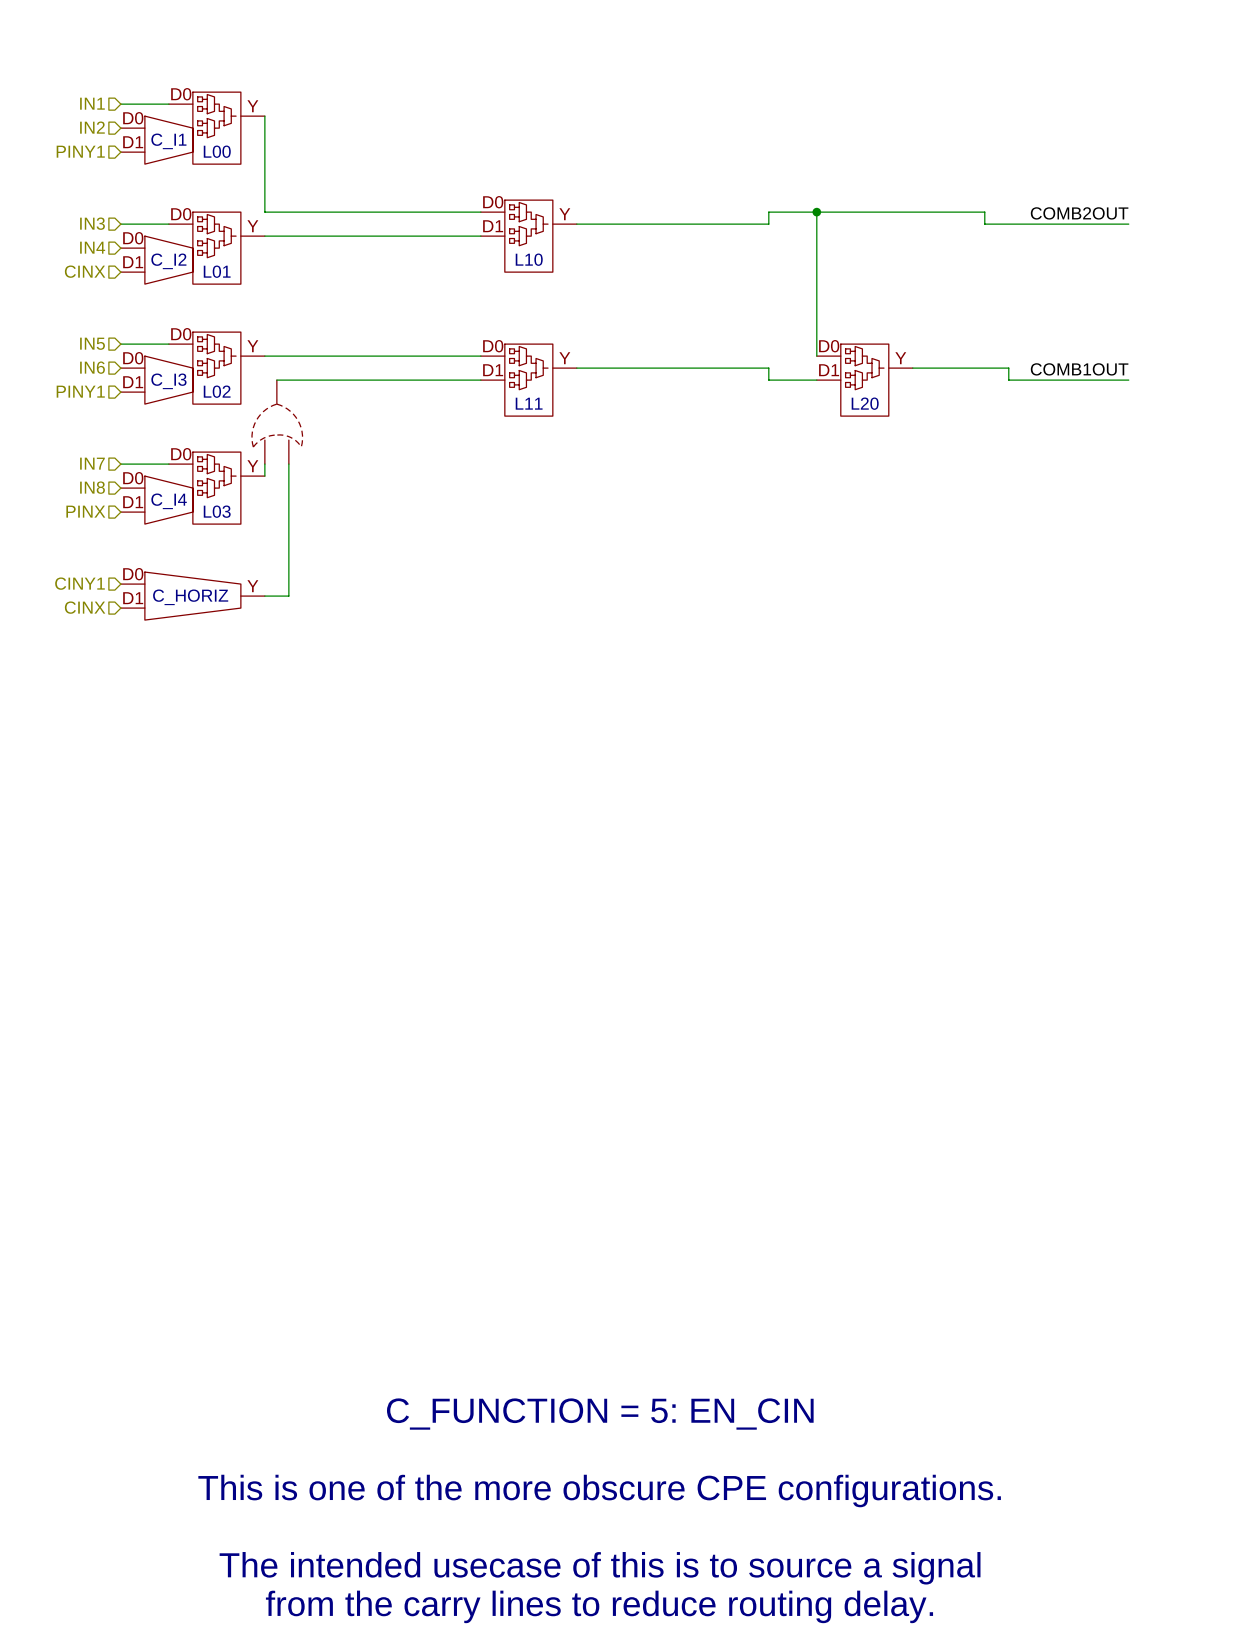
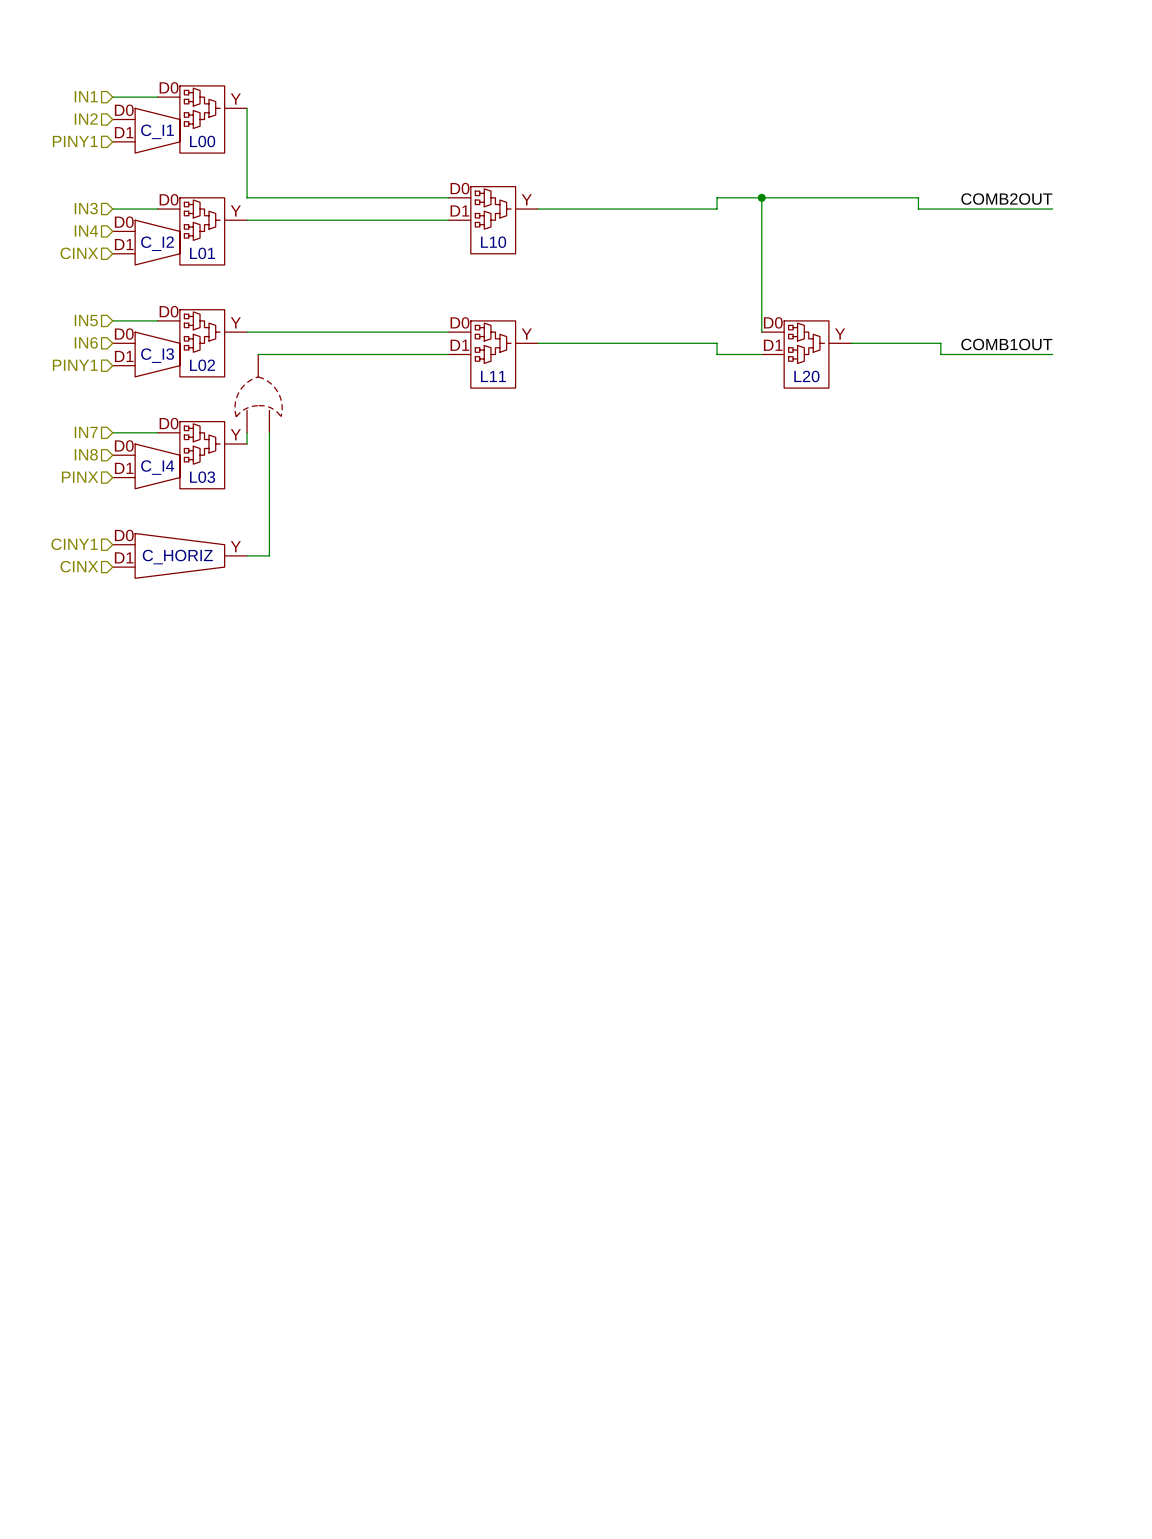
text: C_FUNCTION = 5: EN_CIN (600, 1414) -> none
text: This is one of the more obscure CPE configurations. (599, 1491) -> none
text: The intended usecase of this is to source a signal (600, 1568) -> none
text: from the carry lines to reduce routing delay. (599, 1606) -> none

